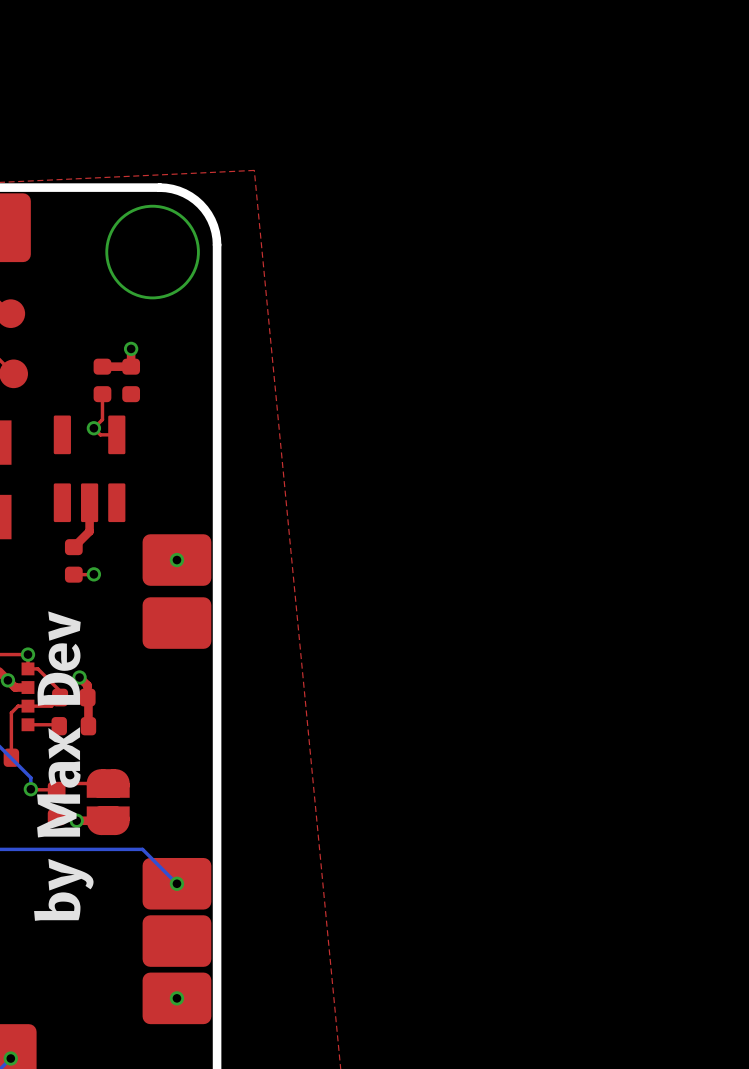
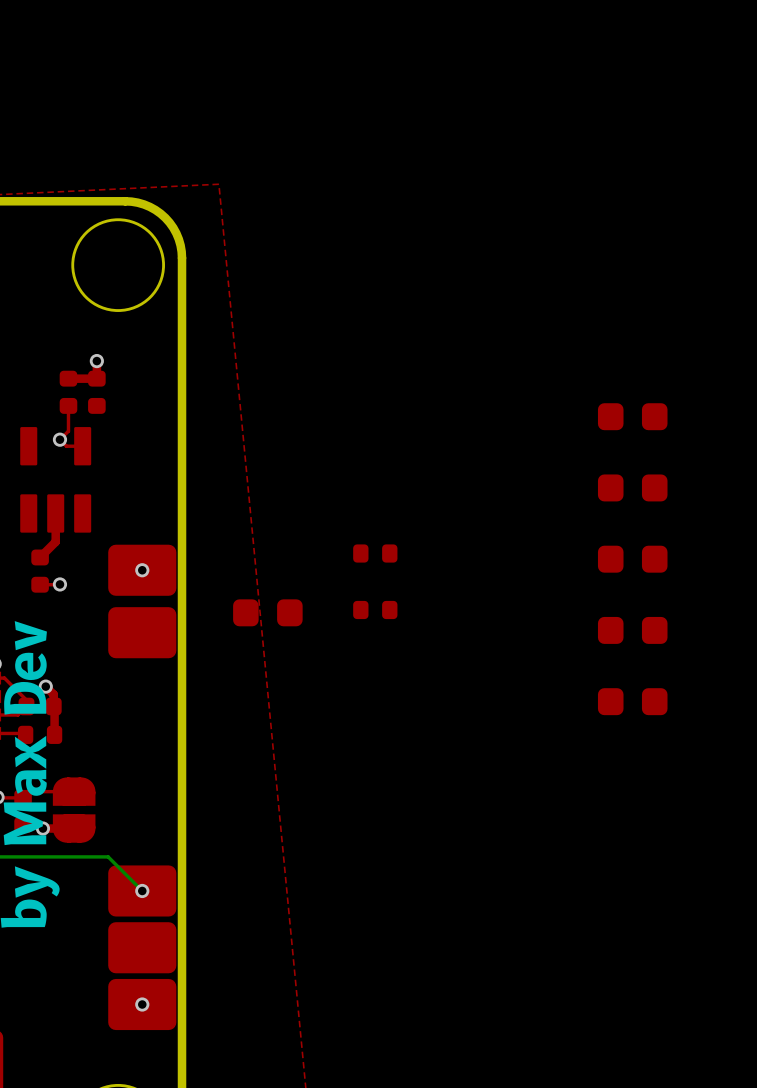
part: none -> (632, 416)
part: none -> (632, 487)
part: none -> (375, 553)
part: none -> (632, 559)
part: none -> (375, 609)
part: none -> (267, 612)
part: none -> (632, 630)
part: none -> (632, 701)

